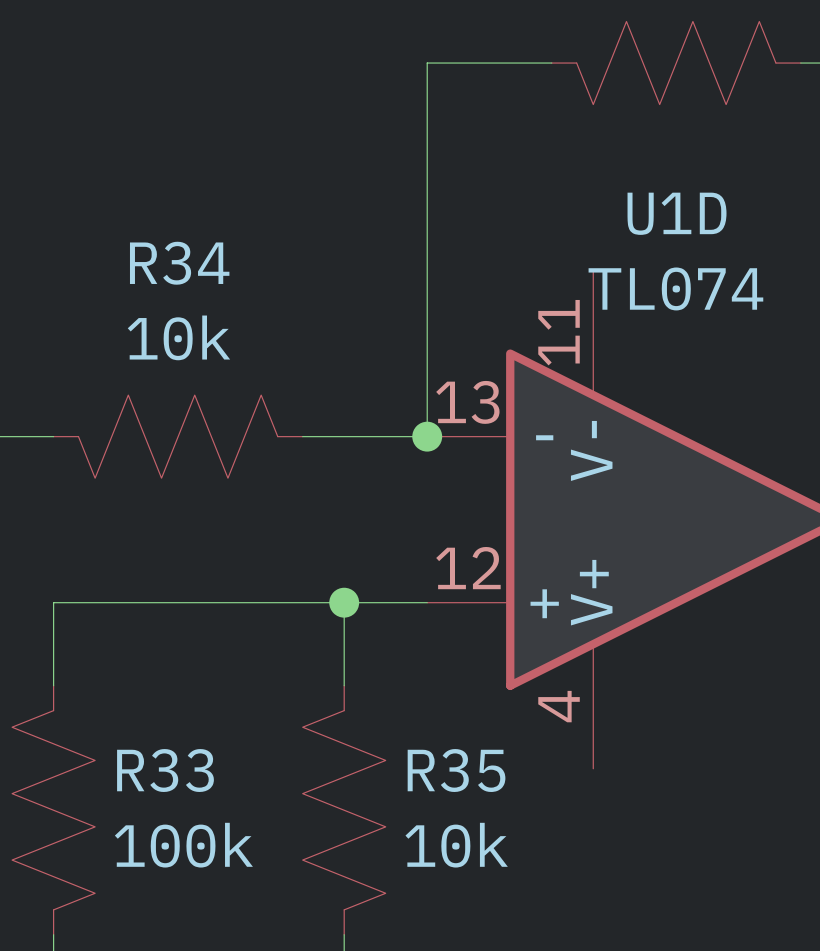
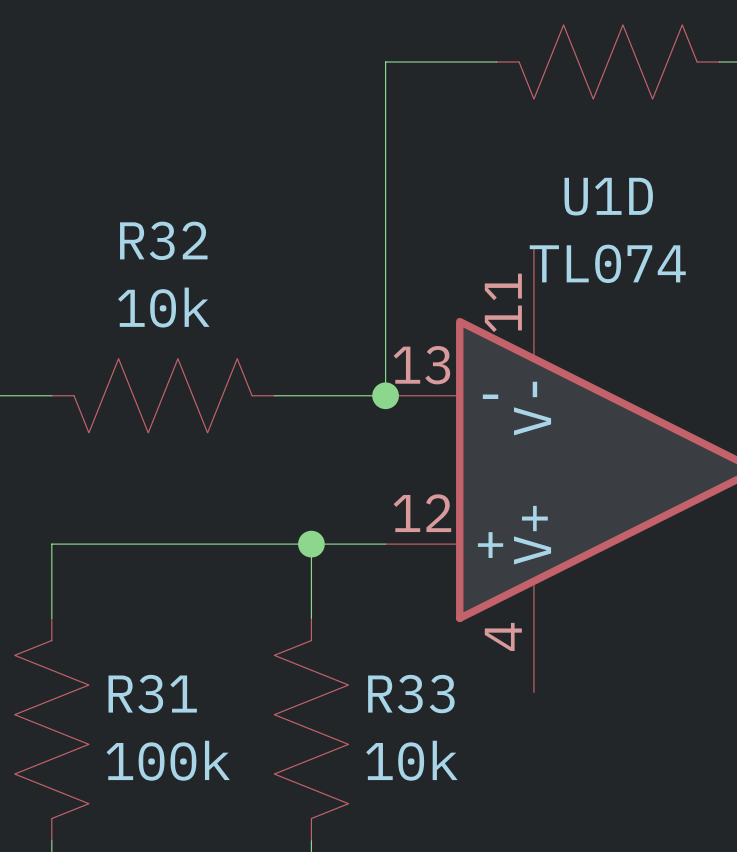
R34 name: R34 (179, 263) -> R32 (163, 240)
R33 name: R33 (165, 770) -> R31 (152, 694)
R35 name: R35 (456, 770) -> R33 (411, 694)

